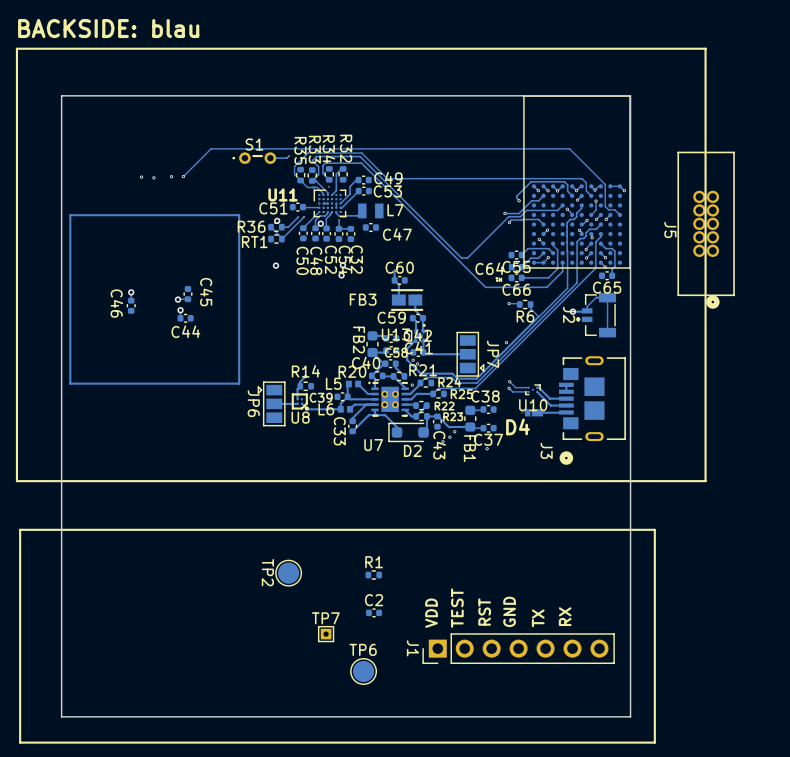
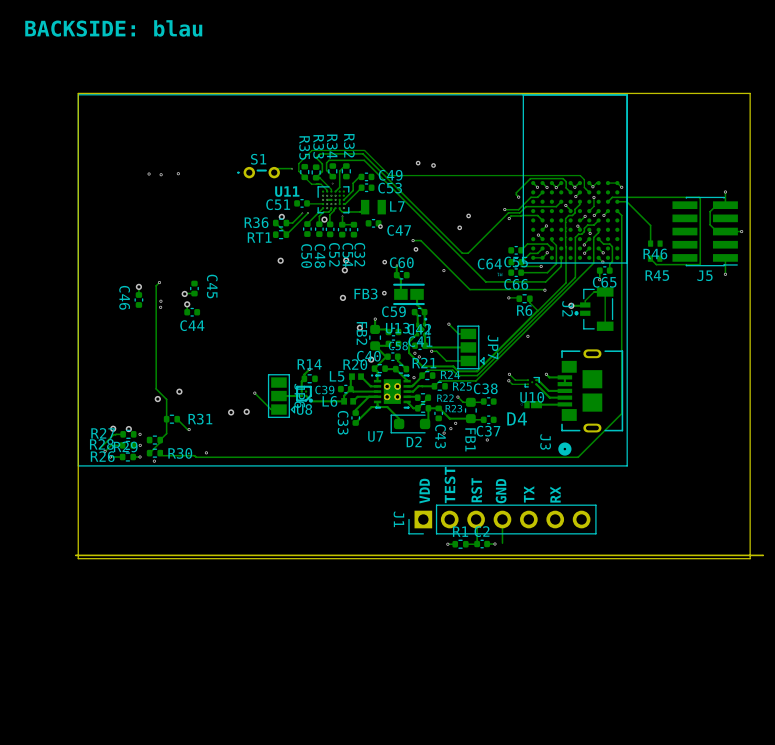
line: (705, 48) (16, 48) (16, 481) (705, 481) (705, 48) -> (627, 94) (627, 465) (78, 465) (78, 94) (627, 94)
board edge: (630, 95) (61, 95) (61, 716) (630, 716) (630, 95) -> (750, 93) (750, 558) (78, 558) (78, 93) (750, 93)
J5 footprint: [677, 151, 735, 309] -> [672, 196, 738, 267]
track: (288, 156) (286, 158) (270, 158) -> none
via position: (288, 156) -> (292, 168)
S1 position: (254, 158) -> (258, 172)
via: none -> (418, 163)
via: none -> (433, 165)
track: none -> (292, 168) (278, 168) (274, 172)
track: (183, 176) (211, 148) (569, 148) (605, 184) (605, 206) (608, 209) (614, 209) (619, 214) -> (162, 455) (578, 457) (621, 413) (621, 215) (617, 211)
via: (183, 176) -> none
track: none -> (725, 191) (725, 205) (716, 205) (710, 211) (710, 224) (716, 231) (741, 231)
via: none -> (725, 191)
track: none -> (607, 201) (612, 197) (700, 198) (700, 264) (656, 264) (650, 258)
track: none -> (617, 201) (626, 201) (650, 225) (650, 243)
track: (239, 215) (70, 215) (70, 383) (239, 383) (239, 215) -> none
via: none -> (468, 215)
J5 name position: J5 (670, 229) -> J5 (704, 275)
via: none -> (380, 226)
via: none -> (459, 227)
via: none -> (741, 231)
track: none -> (413, 240) (420, 240) (469, 289) (544, 290)
via: none -> (413, 240)
R46: none -> (655, 243)
via: none -> (415, 249)
track: none -> (725, 257) (725, 274)
R45: none -> (655, 258)
via: none -> (384, 262)
track: none -> (541, 266) (521, 266)
via: none -> (541, 266)
via: none -> (443, 270)
track: none -> (599, 270) (599, 279)
via: none -> (725, 274)
via: none -> (599, 279)
track: none -> (159, 282) (156, 285) (156, 388) (166, 399) (166, 433) (160, 440)
via: none -> (159, 282)
via: none -> (544, 290)
via: none -> (384, 293)
via: none -> (342, 297)
via: none -> (160, 301)
via: none -> (160, 307)
track: none -> (375, 318) (375, 329)
via: none -> (375, 319)
track: none -> (448, 324) (458, 333) (468, 333)
via: none -> (448, 324)
via: none -> (359, 327)
via position: (506, 342) -> (527, 336)
track: none -> (431, 351) (436, 351) (446, 360) (468, 360)
via: none -> (431, 351)
via: none -> (371, 359)
track: none -> (546, 374) (549, 377) (564, 377)
via: none -> (546, 374)
via: none -> (179, 391)
track: none -> (254, 393) (271, 409) (278, 409)
via: none -> (254, 393)
JP6 rotation: 0° (271, 403) -> 180° (281, 396)
track: none -> (457, 397) (463, 402) (470, 402)
via: none -> (457, 397)
via: none -> (157, 399)
via: none -> (231, 412)
via: none -> (246, 411)
R31: none -> (171, 419)
track: none -> (177, 419) (189, 429)
via: none -> (113, 428)
via: none -> (128, 429)
via: none -> (189, 429)
track: none -> (123, 434) (113, 434) (99, 448)
R27: none -> (128, 434)
via: none -> (140, 434)
R29: none -> (154, 440)
track: none -> (160, 440) (160, 442) (149, 453)
track: none -> (122, 445) (111, 445) (105, 451)
R28: none -> (127, 445)
via: none -> (140, 445)
via: none -> (105, 451)
via: none -> (206, 452)
R30: none -> (154, 453)
via: none -> (110, 457)
track: none -> (122, 457) (110, 457)
R26: none -> (127, 457)
track: none -> (140, 457) (133, 457)
via: none -> (140, 457)
via: none -> (154, 461)
line: (654, 529) (20, 529) (20, 742) (654, 742) (654, 529) -> none
track: none -> (476, 519) (477, 544) (465, 544)
track: none -> (502, 519) (502, 543)
via: none -> (447, 544)
track: none -> (455, 544) (447, 544)
track: none -> (495, 544) (487, 544)
via: none -> (495, 544)
board edge: none -> (763, 555) (75, 555) (75, 555) (763, 555) (763, 555)
TP2: (288, 573) -> none
R1 position: (373, 575) -> (460, 544)
text position: TEST (457, 608) -> TEST (450, 484)
text position: GND (509, 611) -> GND (501, 491)
C2 position: (374, 612) -> (482, 544)
text position: RST (484, 612) -> RST (476, 490)
text position: VDD (431, 613) -> VDD (424, 491)
text position: RX (565, 616) -> RX (555, 494)
text position: TX (538, 618) -> TX (529, 494)
TP7: (326, 634) -> none
J1 position: (518, 648) -> (502, 519)
TP6: (363, 671) -> none

